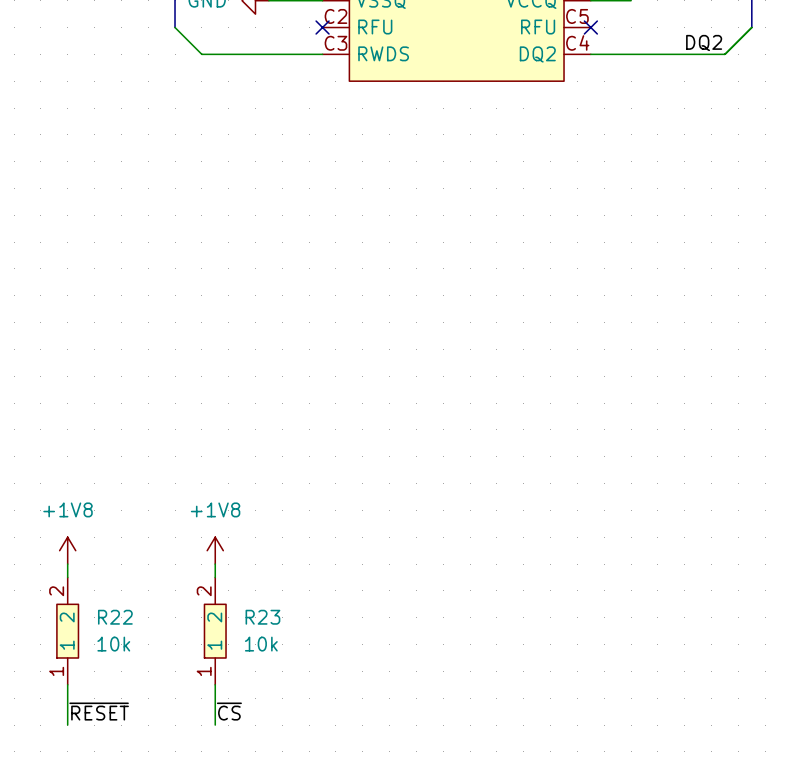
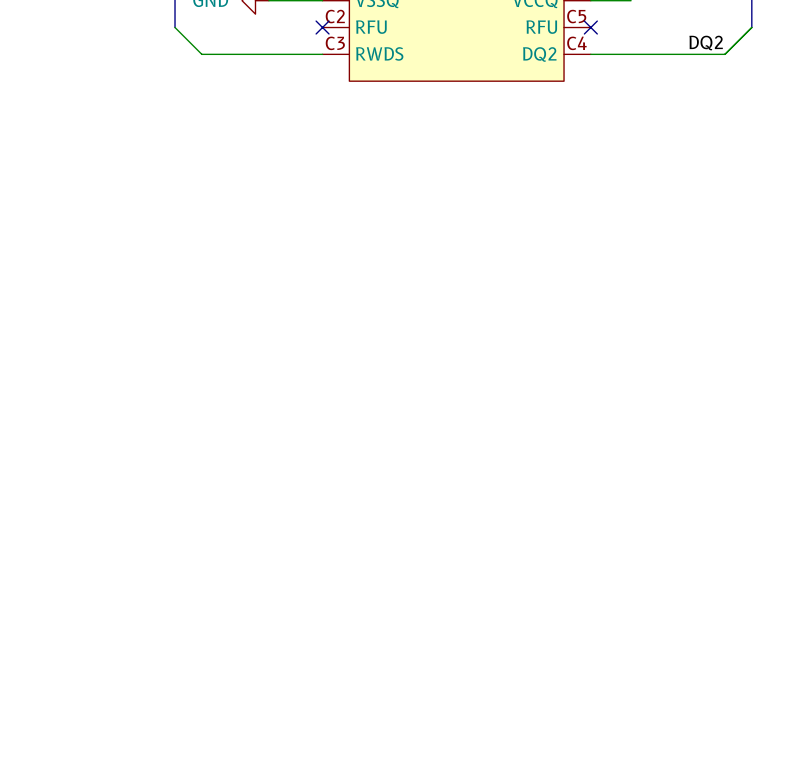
power symbol: +1V8 (67, 550) -> none
power symbol: +1V8 (215, 550) -> none
wire: (67, 564) (67, 577) -> none
wire: (215, 564) (215, 577) -> none
R22: 10k (67, 631) -> none
R23: 10k (215, 631) -> none
wire: (67, 684) (67, 725) -> none
wire: (215, 684) (215, 725) -> none
label: ~{RESET} (99, 711) -> none
label: ~{CS} (229, 711) -> none

